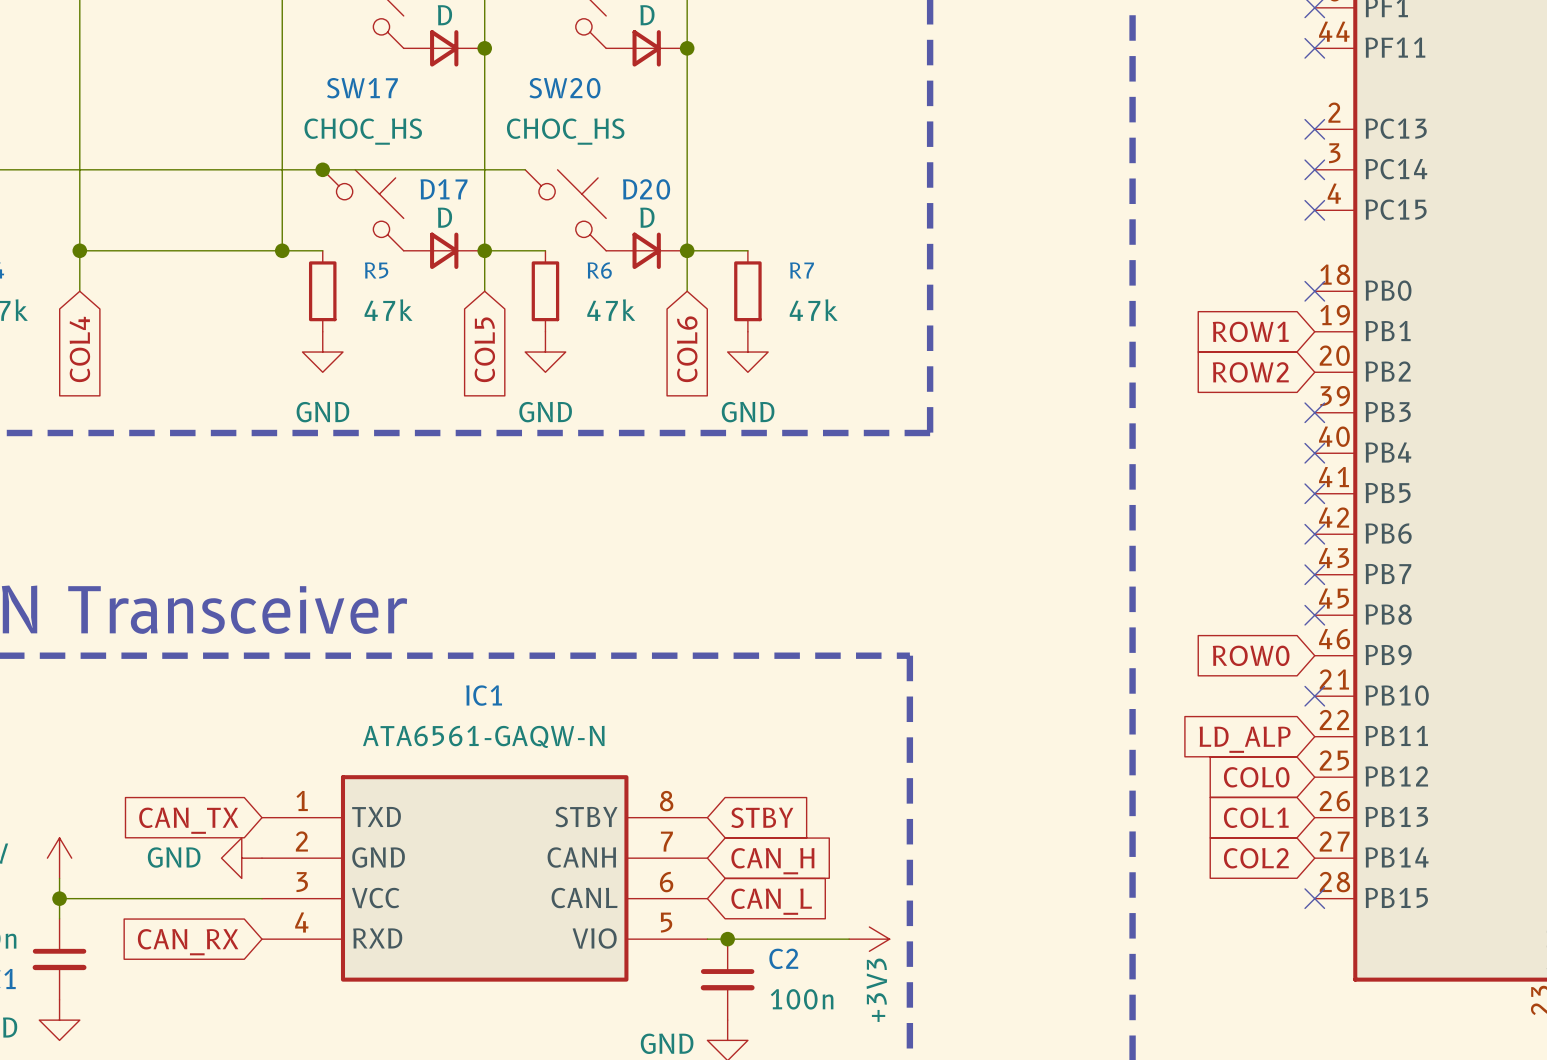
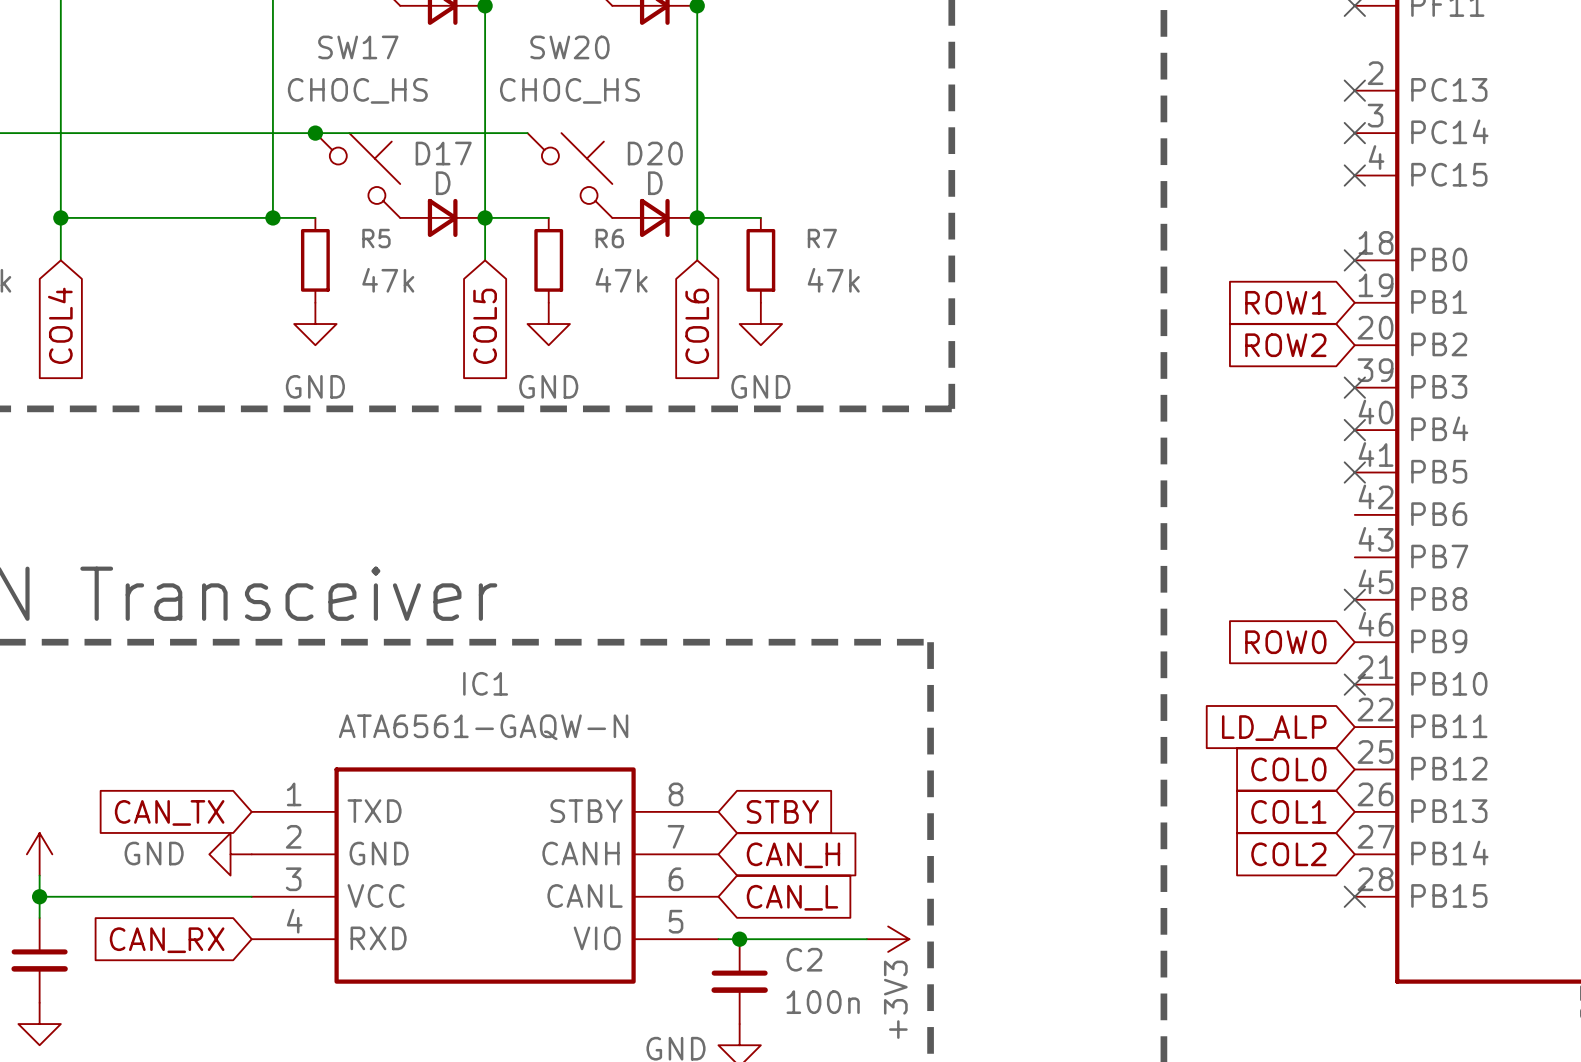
no-connect mark: (1314, 534) -> none
no-connect mark: (1314, 574) -> none

